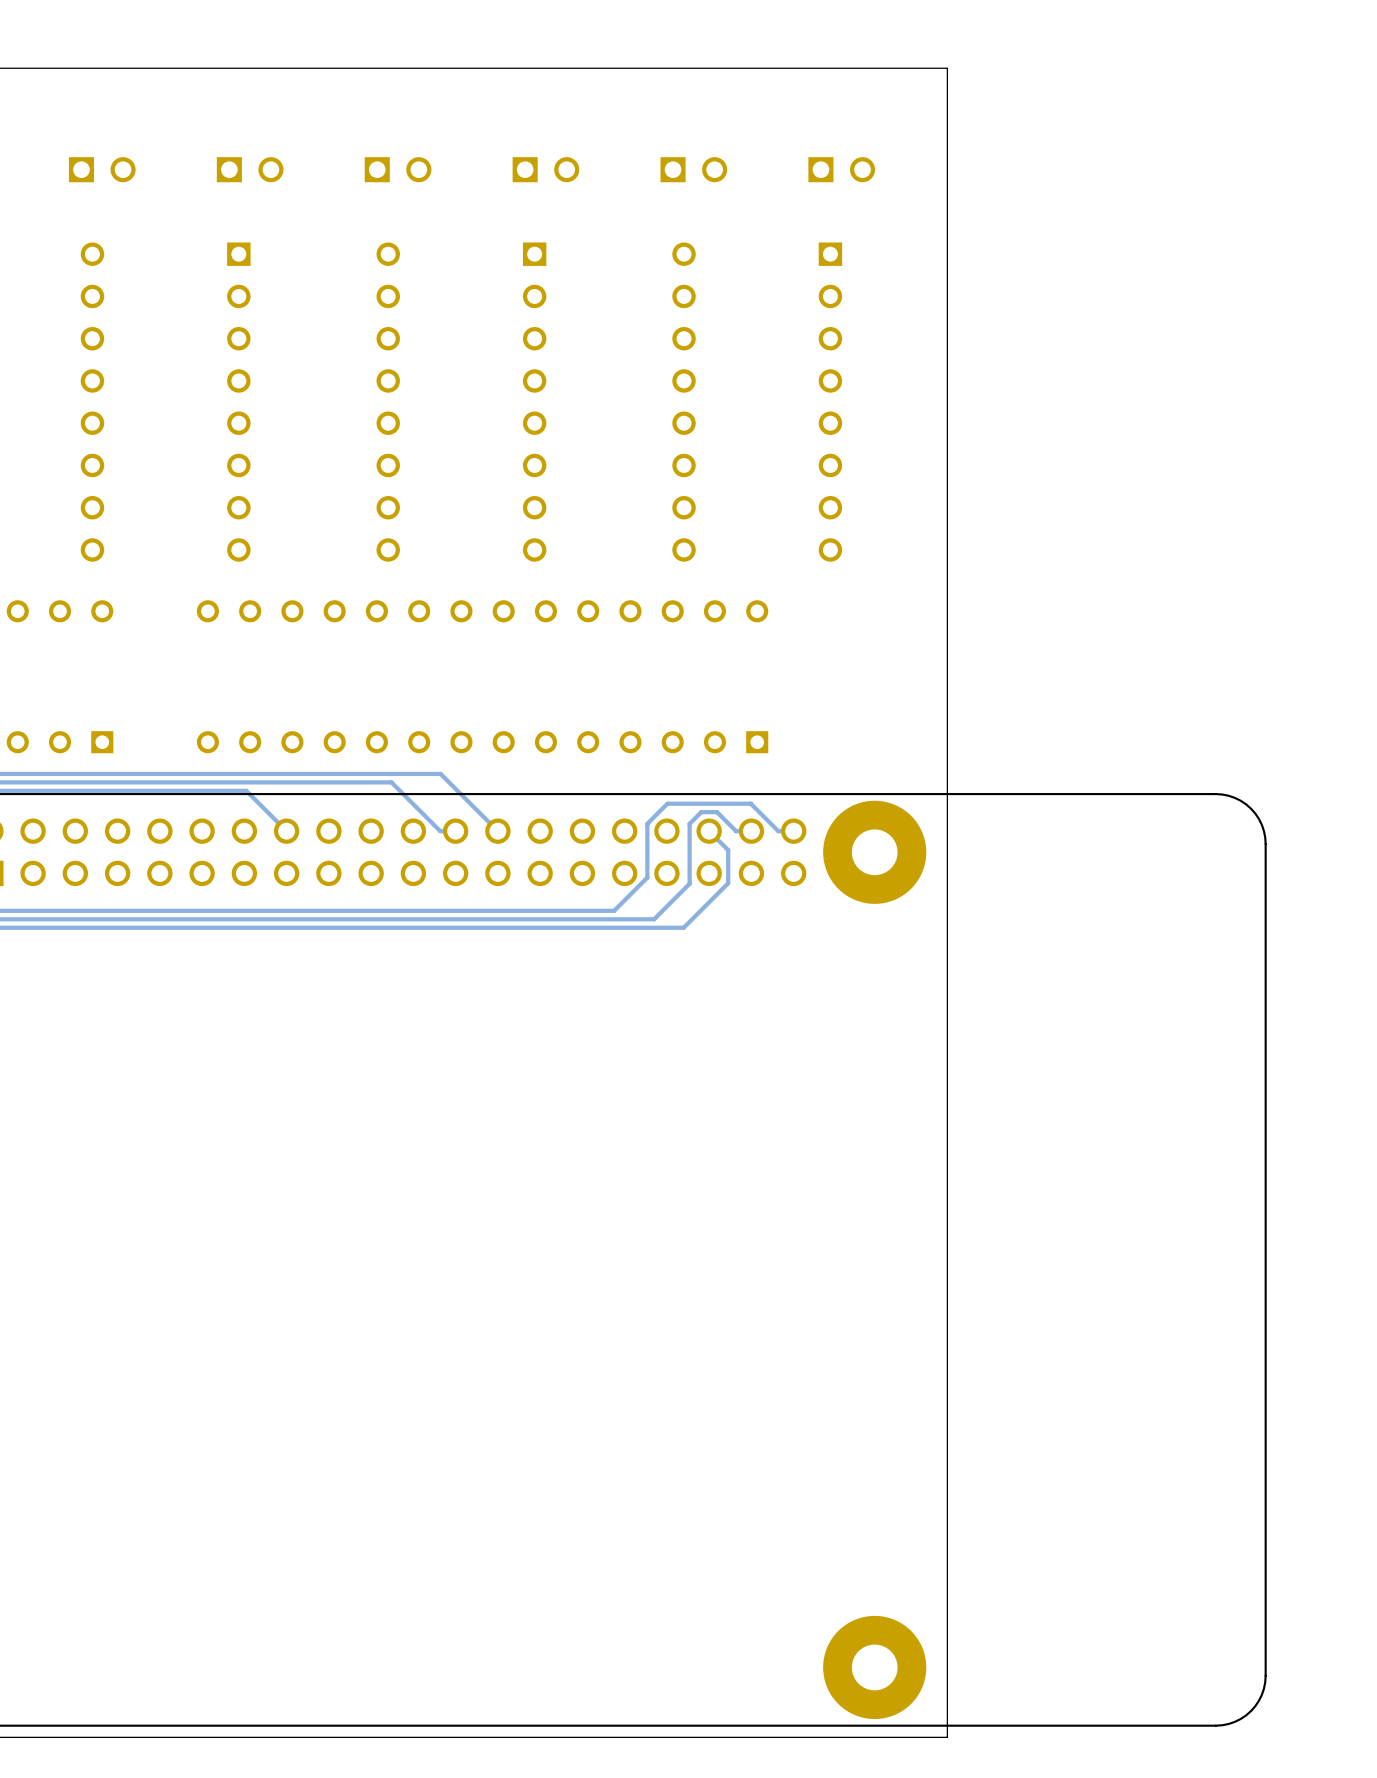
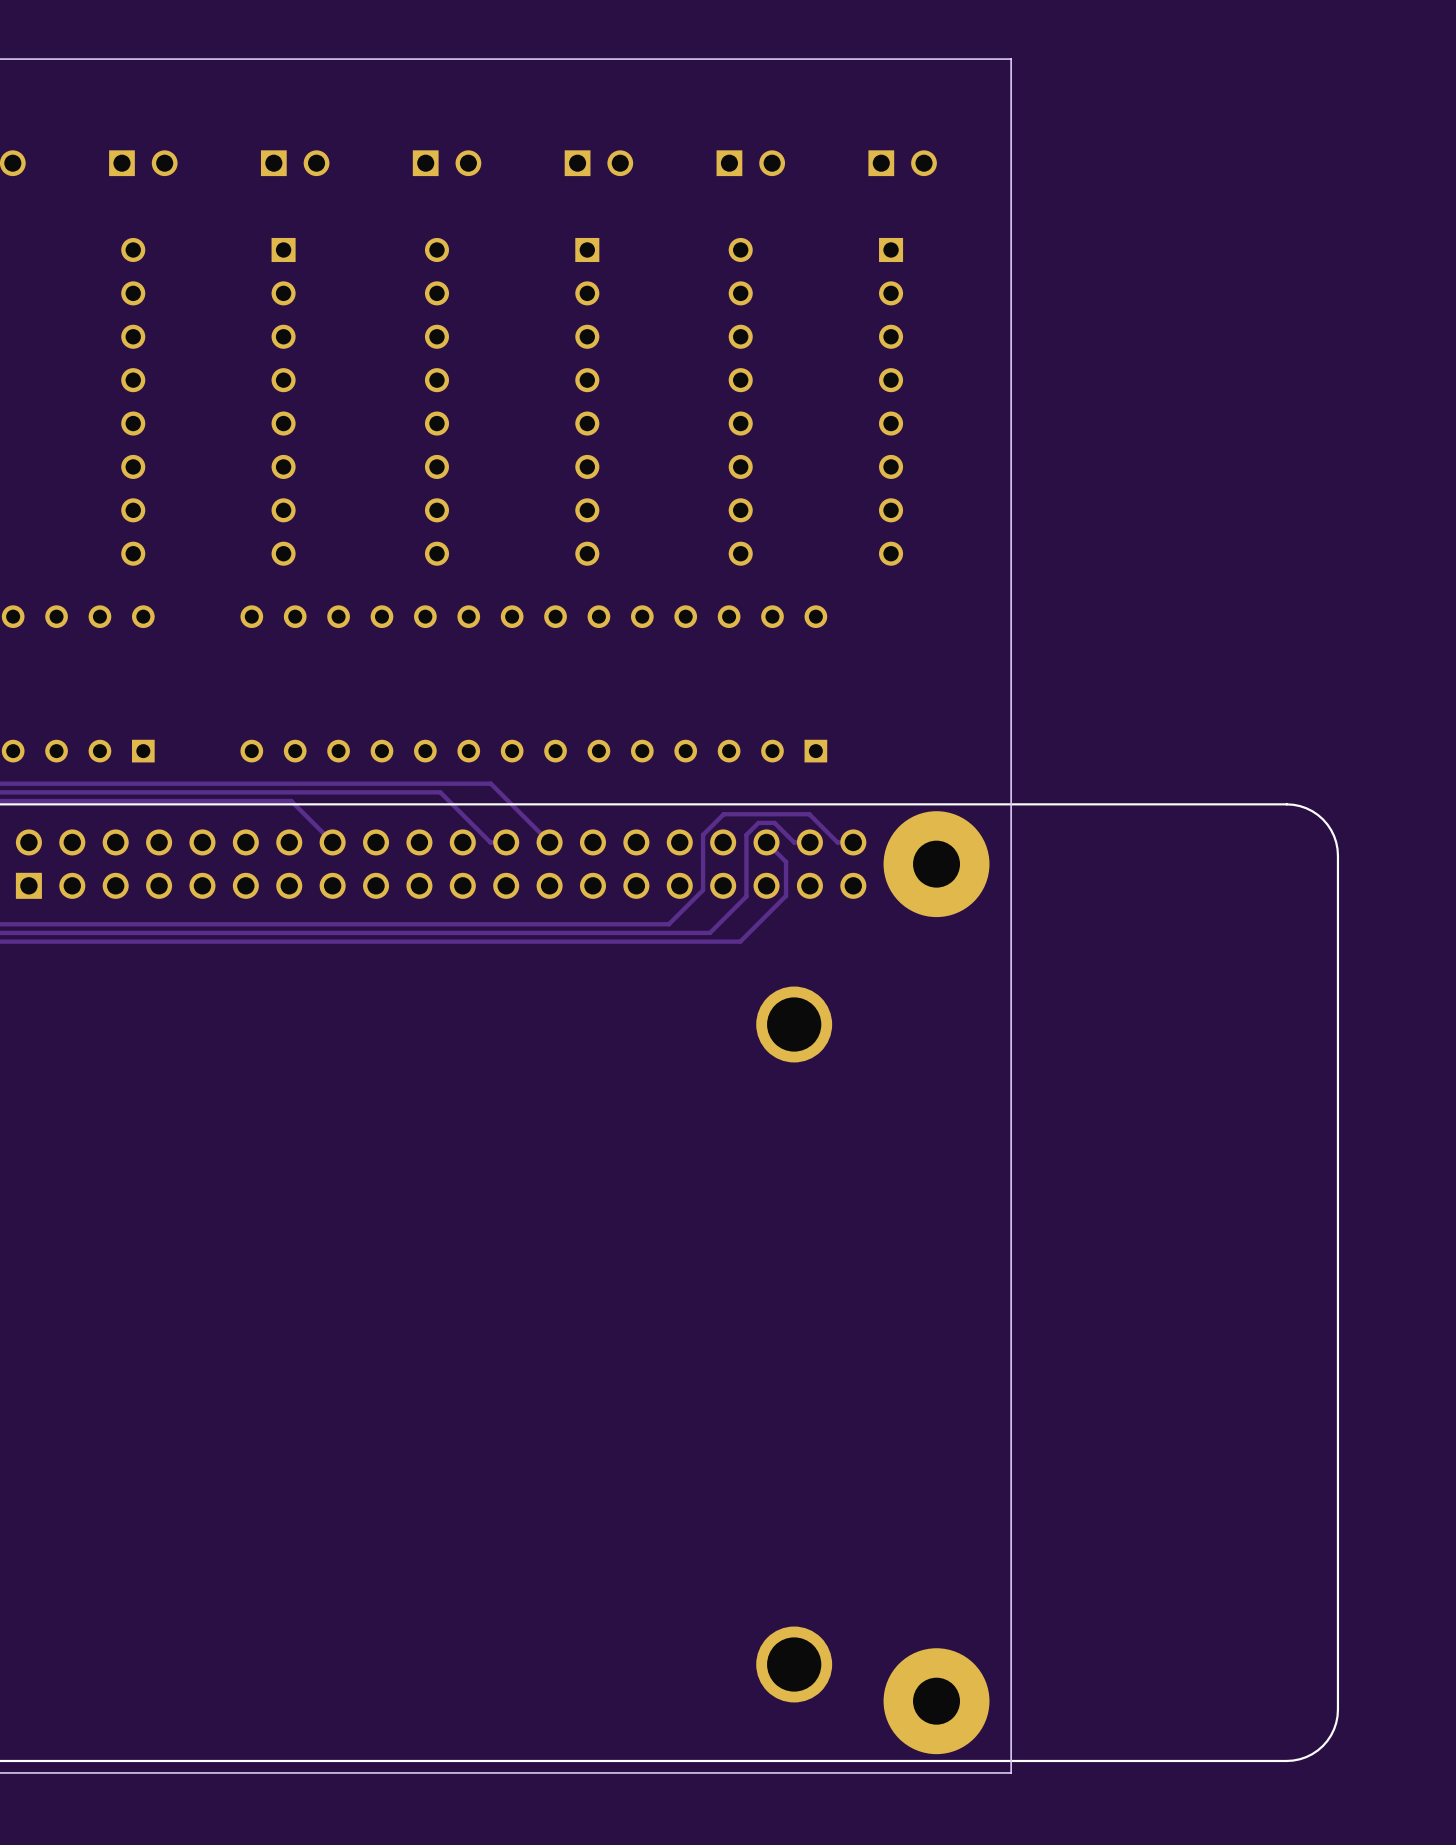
part: none -> (794, 1024)
part: none -> (794, 1664)

